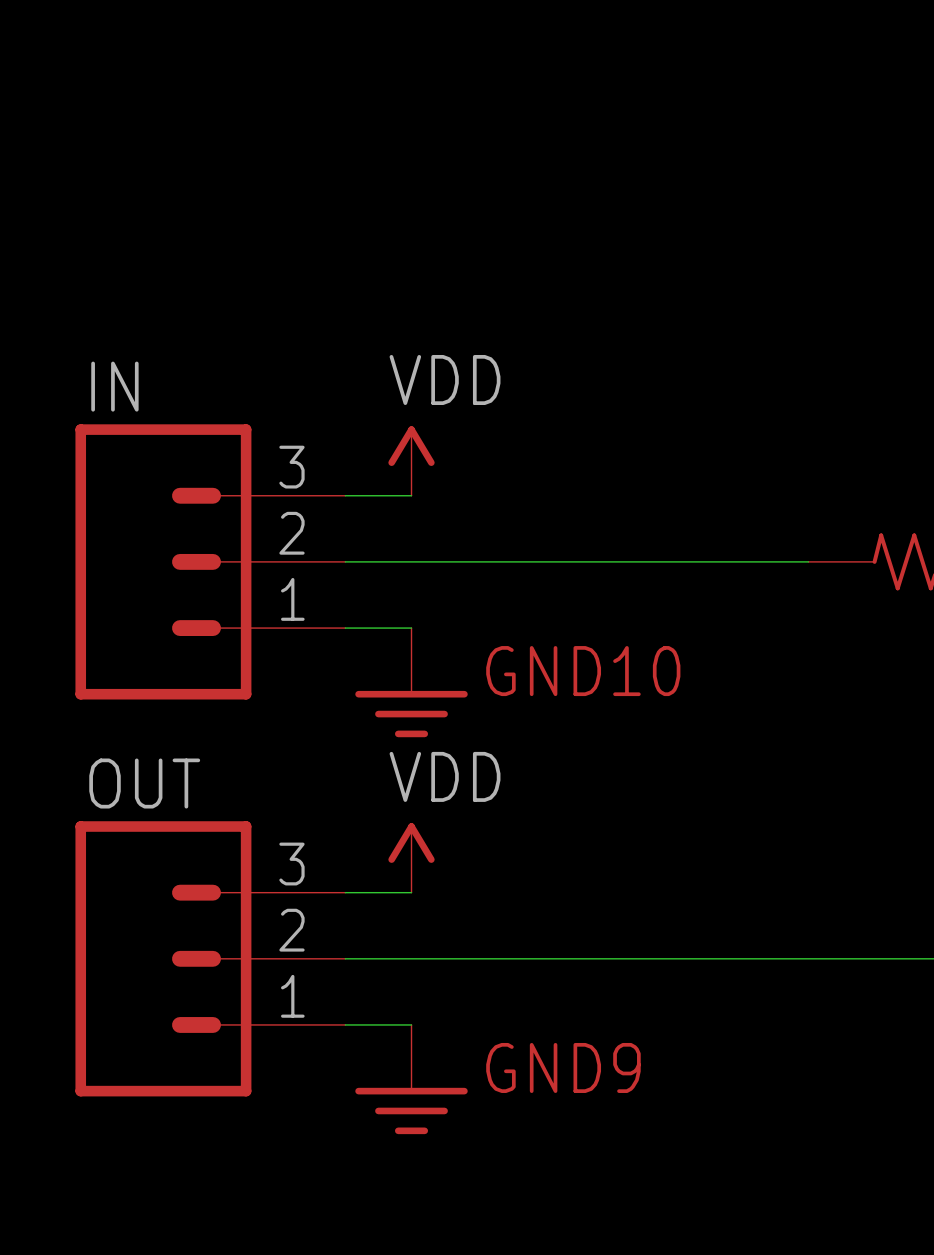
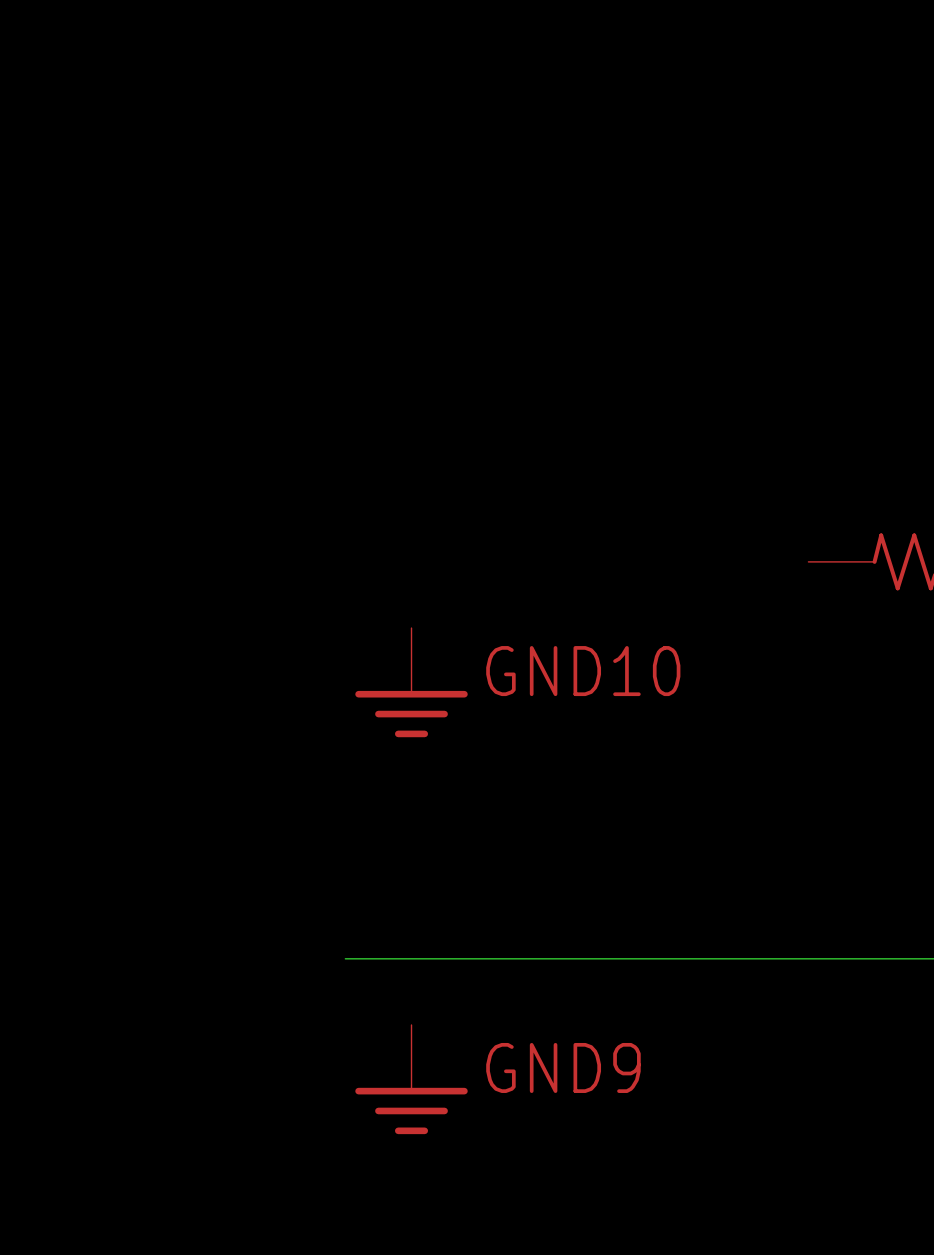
power symbol: VDD (411, 461) -> none
wire: (345, 495) (411, 495) -> none
IN: (210, 561) -> none
wire: (345, 561) (808, 561) -> none
wire: (345, 628) (411, 628) -> none
power symbol: VDD (411, 857) -> none
wire: (345, 892) (411, 892) -> none
OUT: (210, 958) -> none
wire: (345, 1024) (411, 1024) -> none

